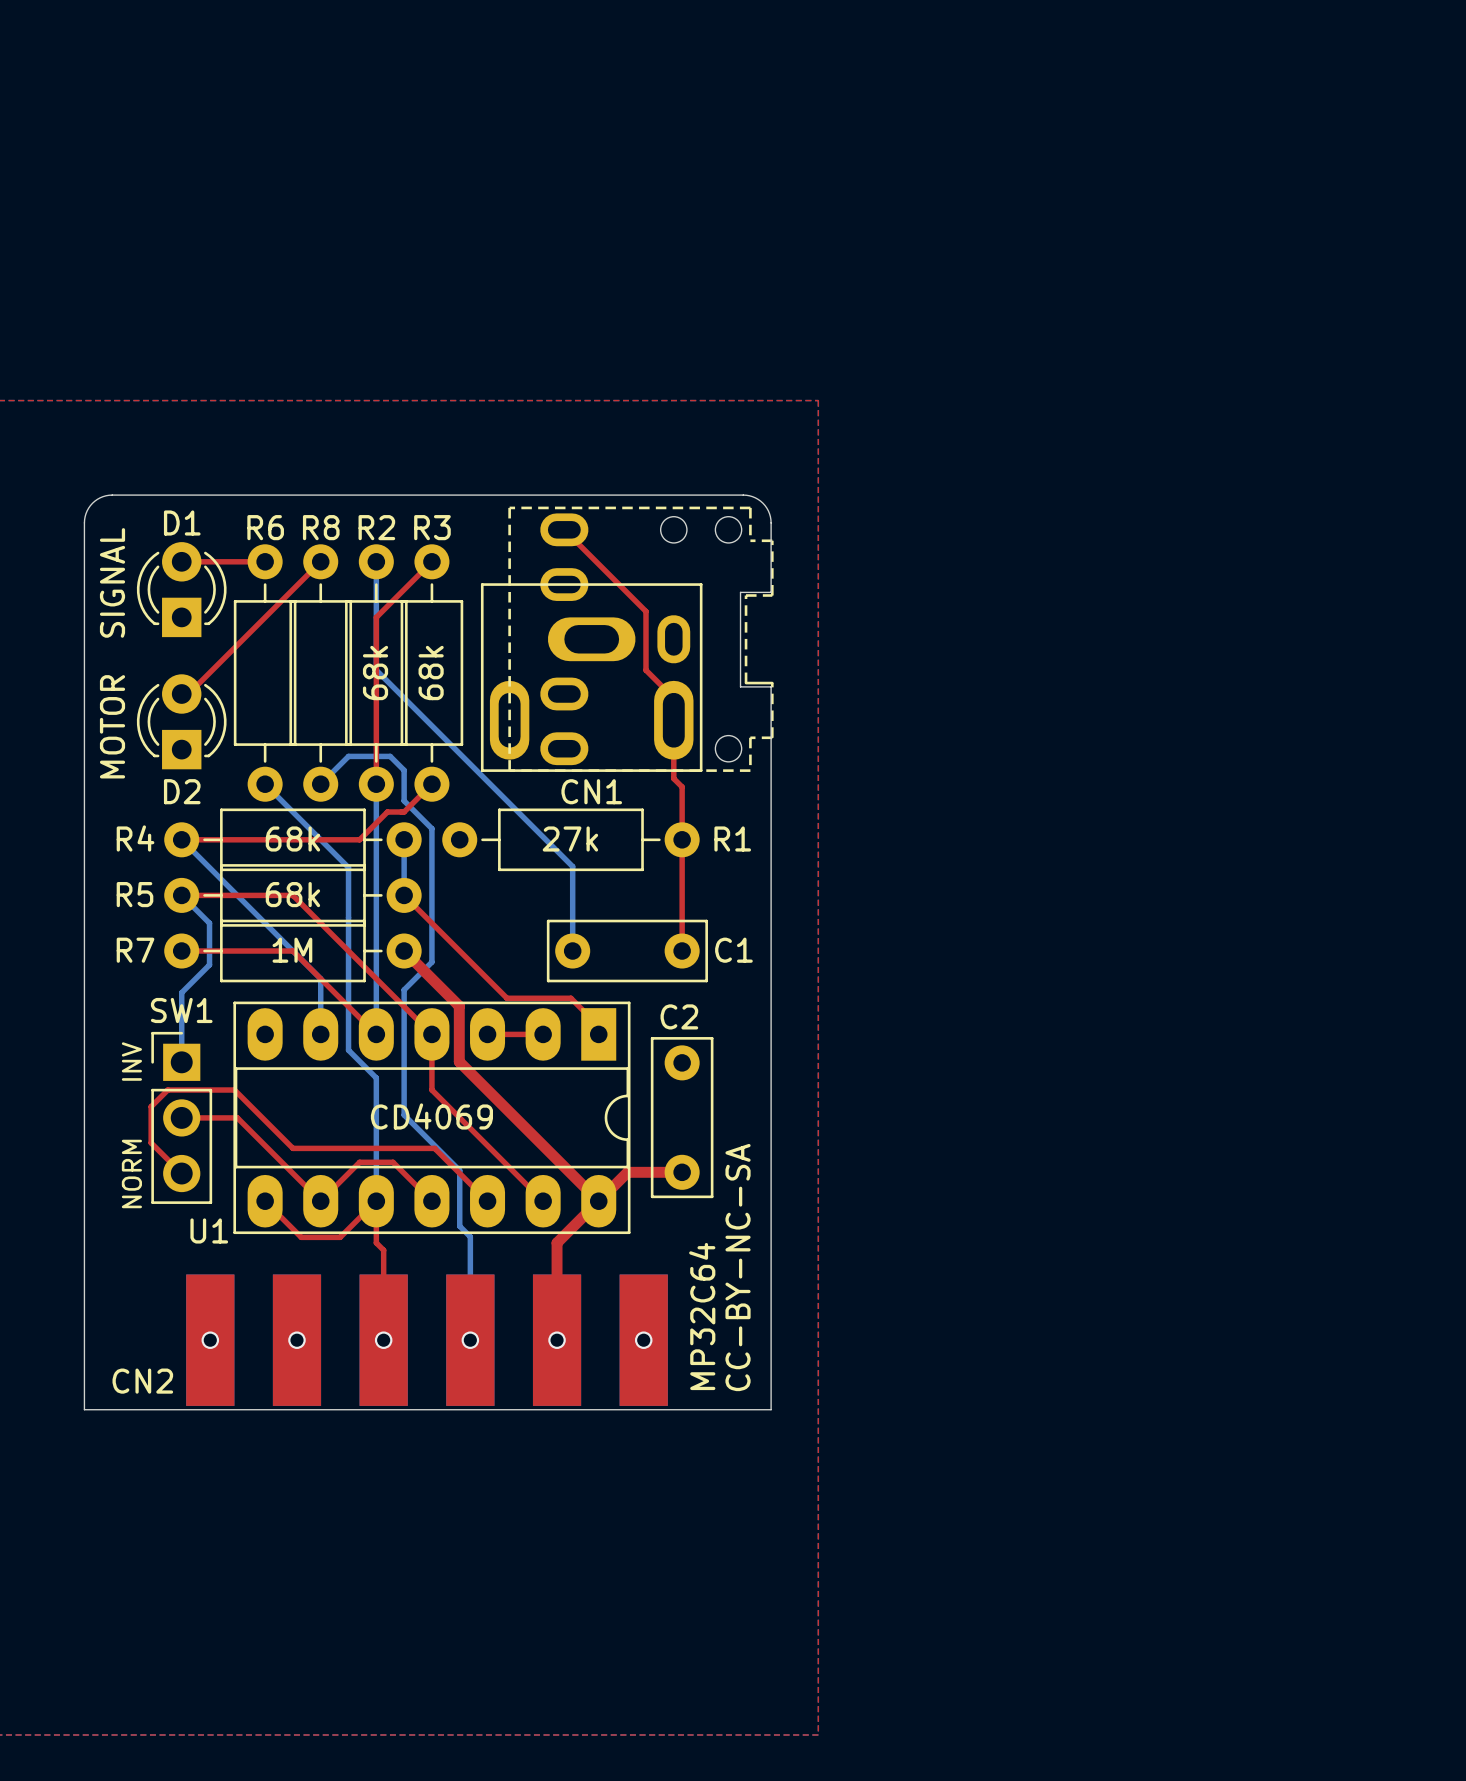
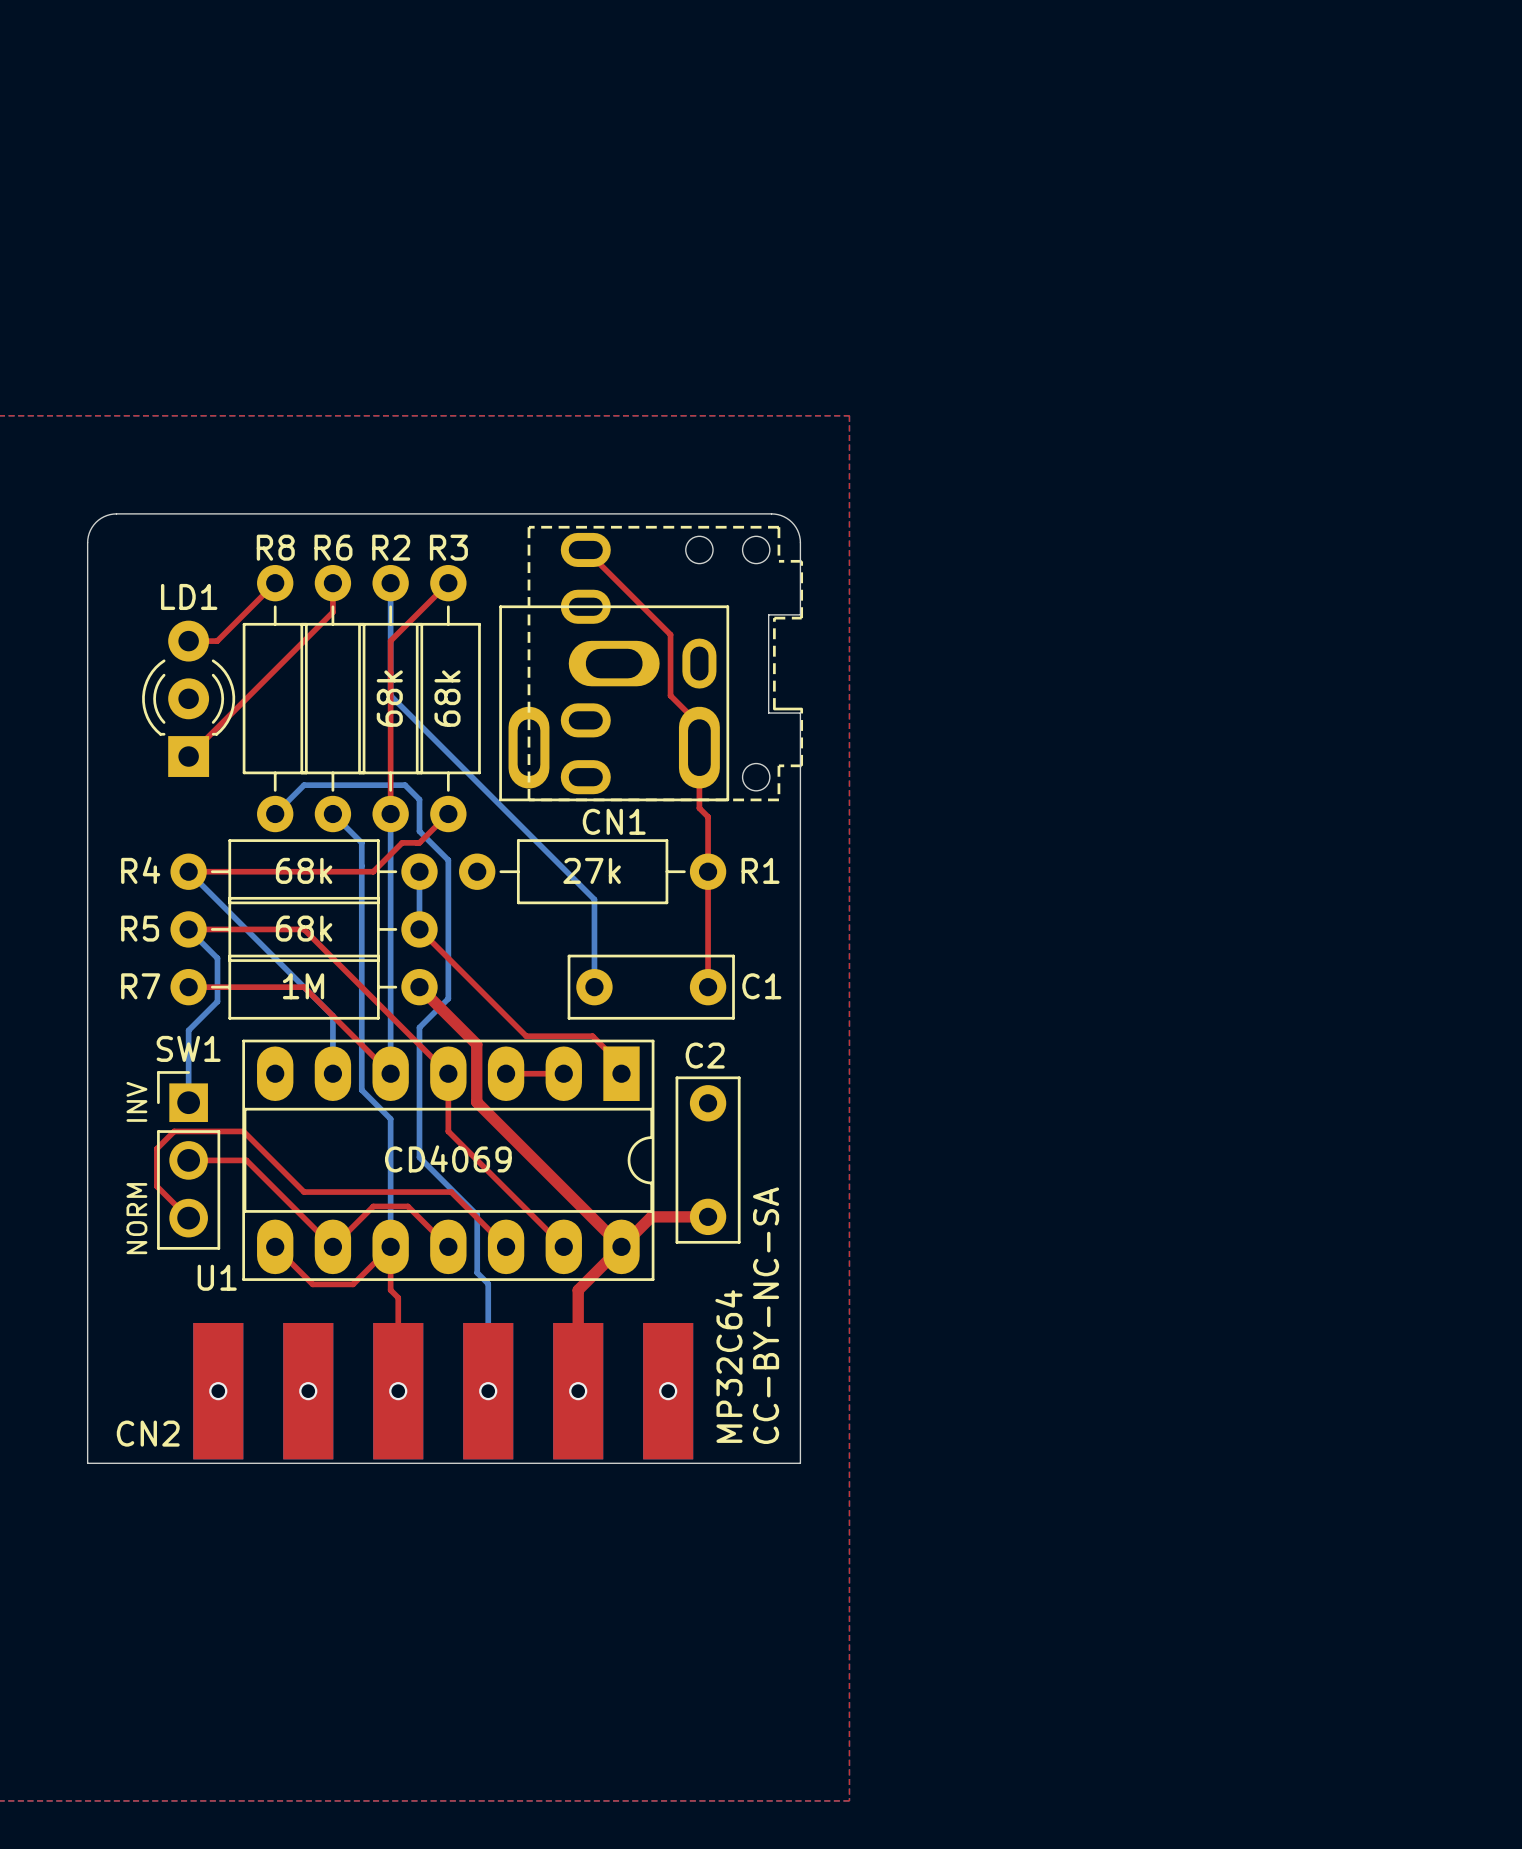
R6 name: R6 (265, 527) -> R8 (275, 547)
R8 name: R8 (321, 527) -> R6 (333, 547)
top track: (181, 561) (265, 561) -> (188, 641) (217, 641) (275, 583)
top track: (320, 561) (188, 694) (181, 694) -> (332, 583) (332, 612) (188, 756)
text: SIGNAL (112, 582) -> none
D1: (181, 589) -> none
LD1: none -> (188, 698)
D2: (181, 721) -> none
text: MOTOR (112, 726) -> none
bottom track: (348, 756) (320, 784) -> (361, 785) (304, 785) (275, 814)
bottom track: (265, 784) (348, 867) -> (332, 814) (361, 842) (361, 900)

